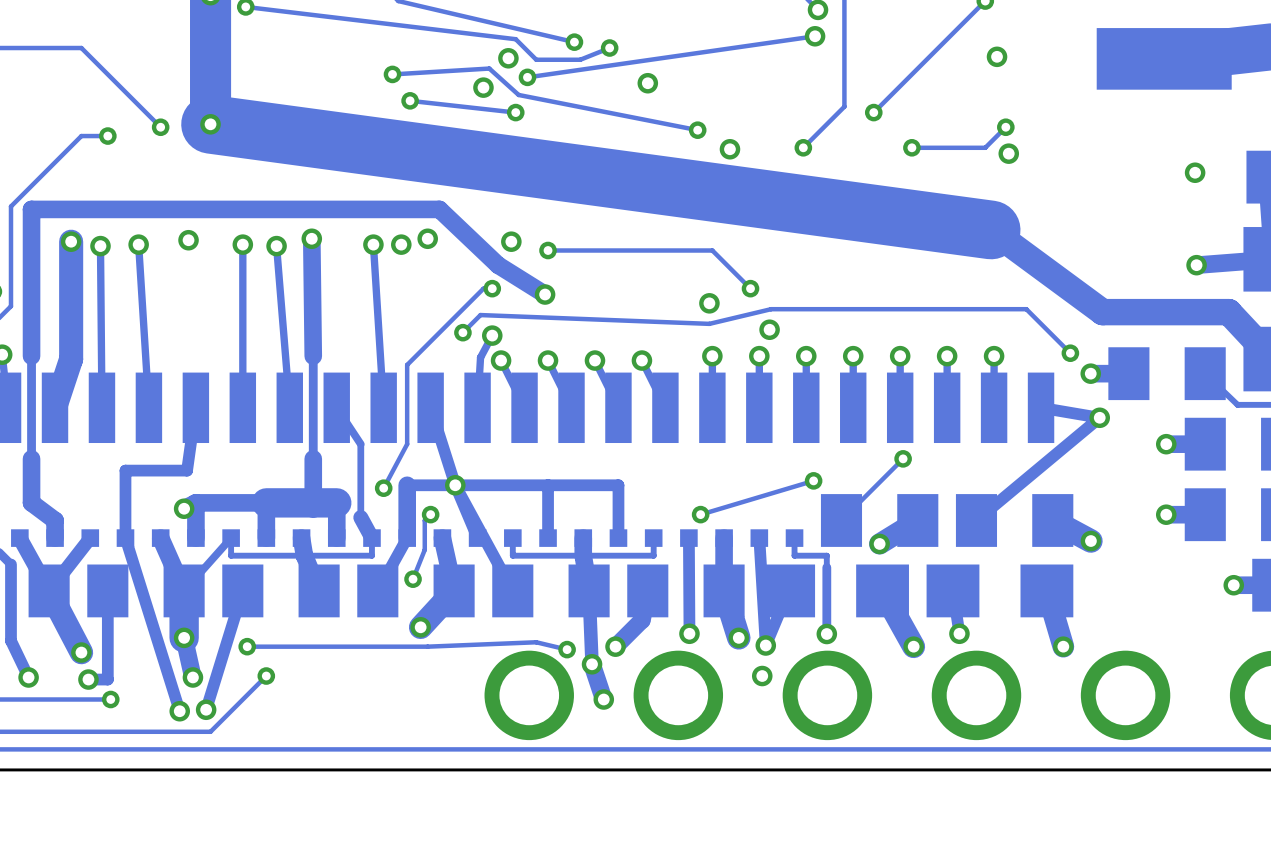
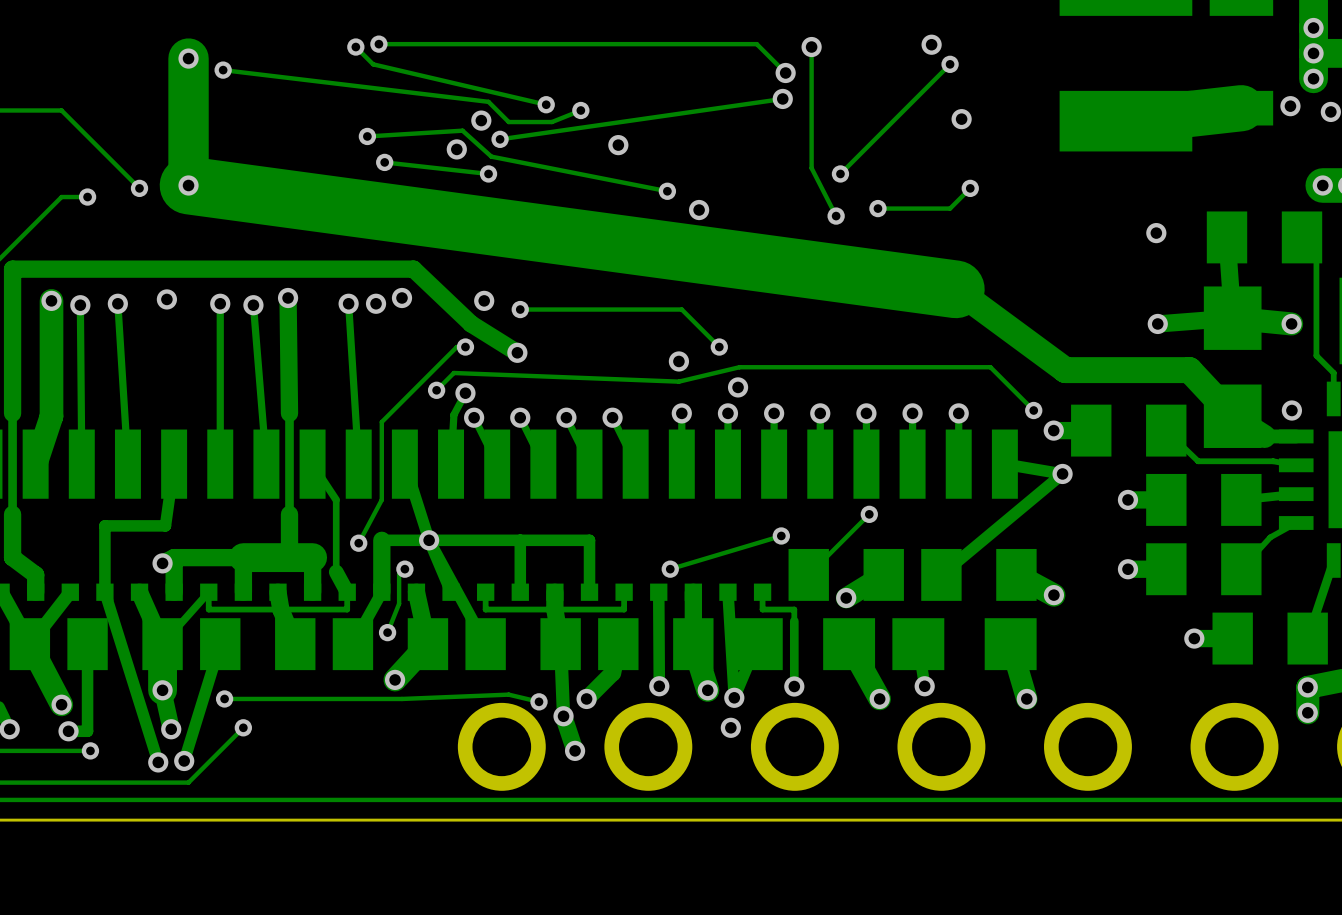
track: (844, 106) (803, 147) -> (811, 168) (836, 216)
via position: (803, 147) -> (836, 216)
via: (1008, 153) -> none

